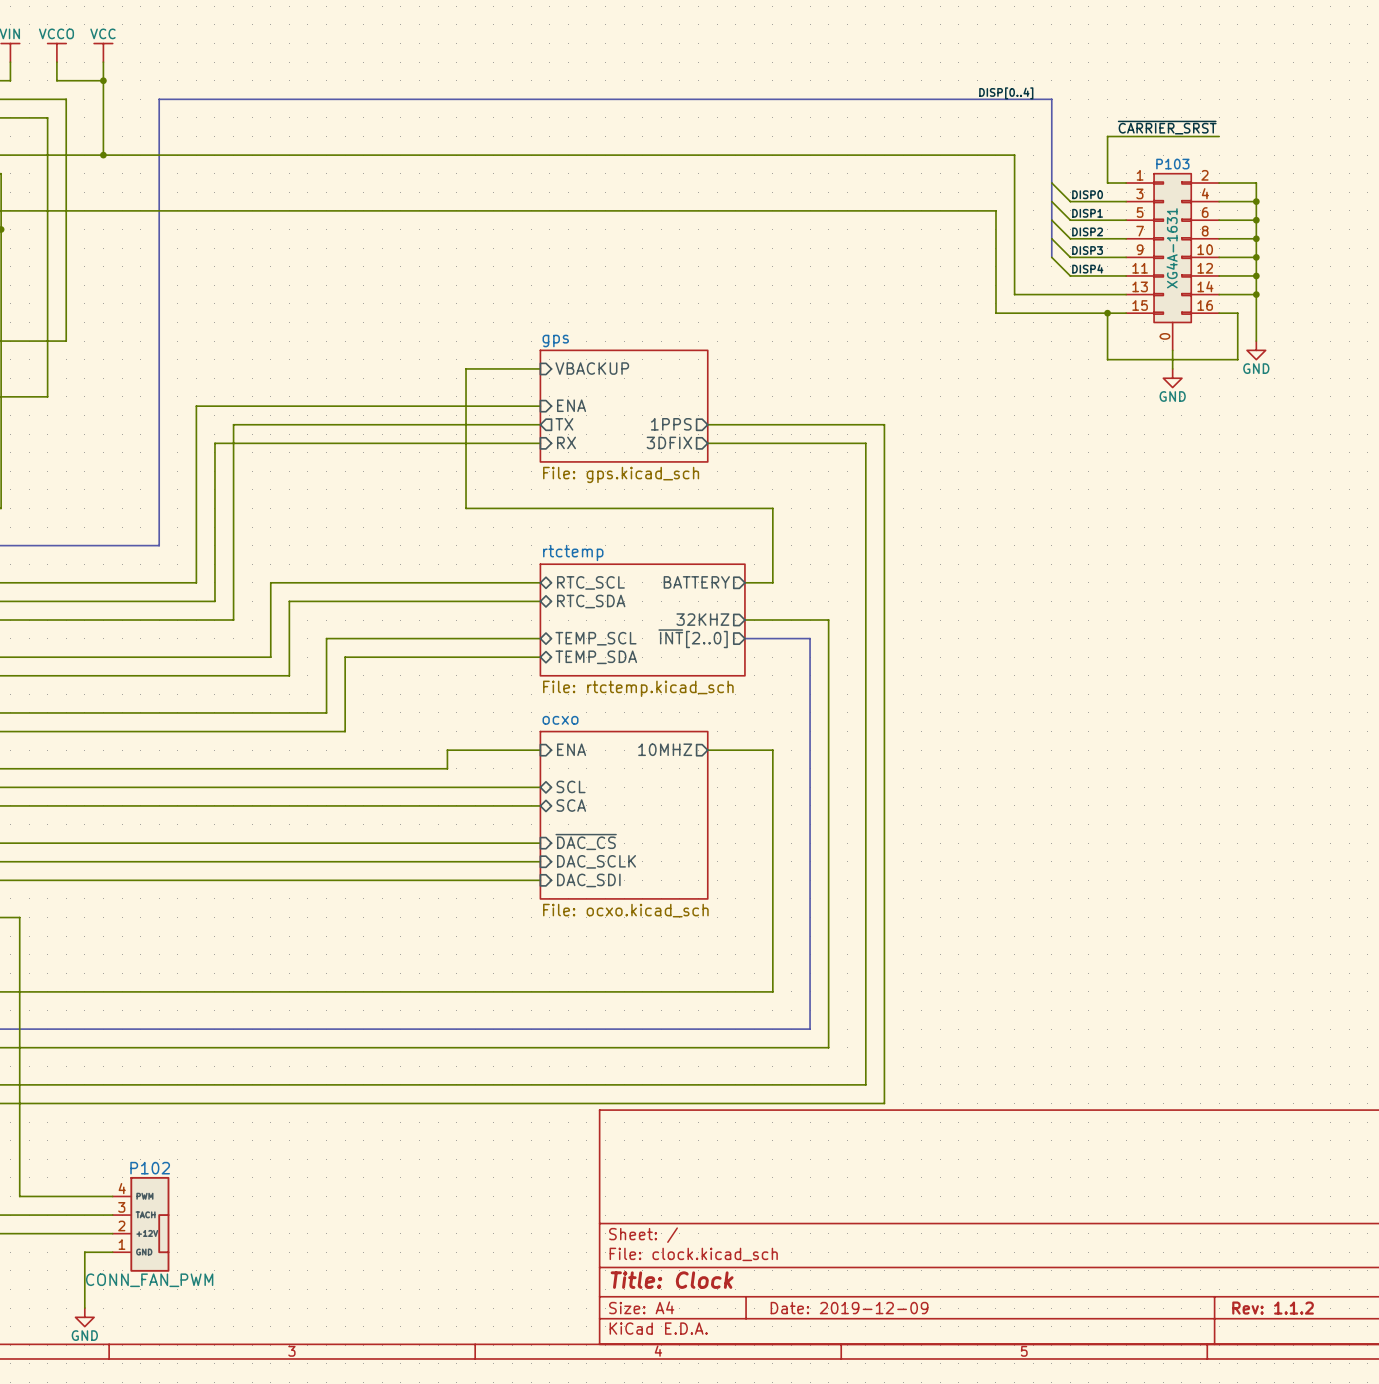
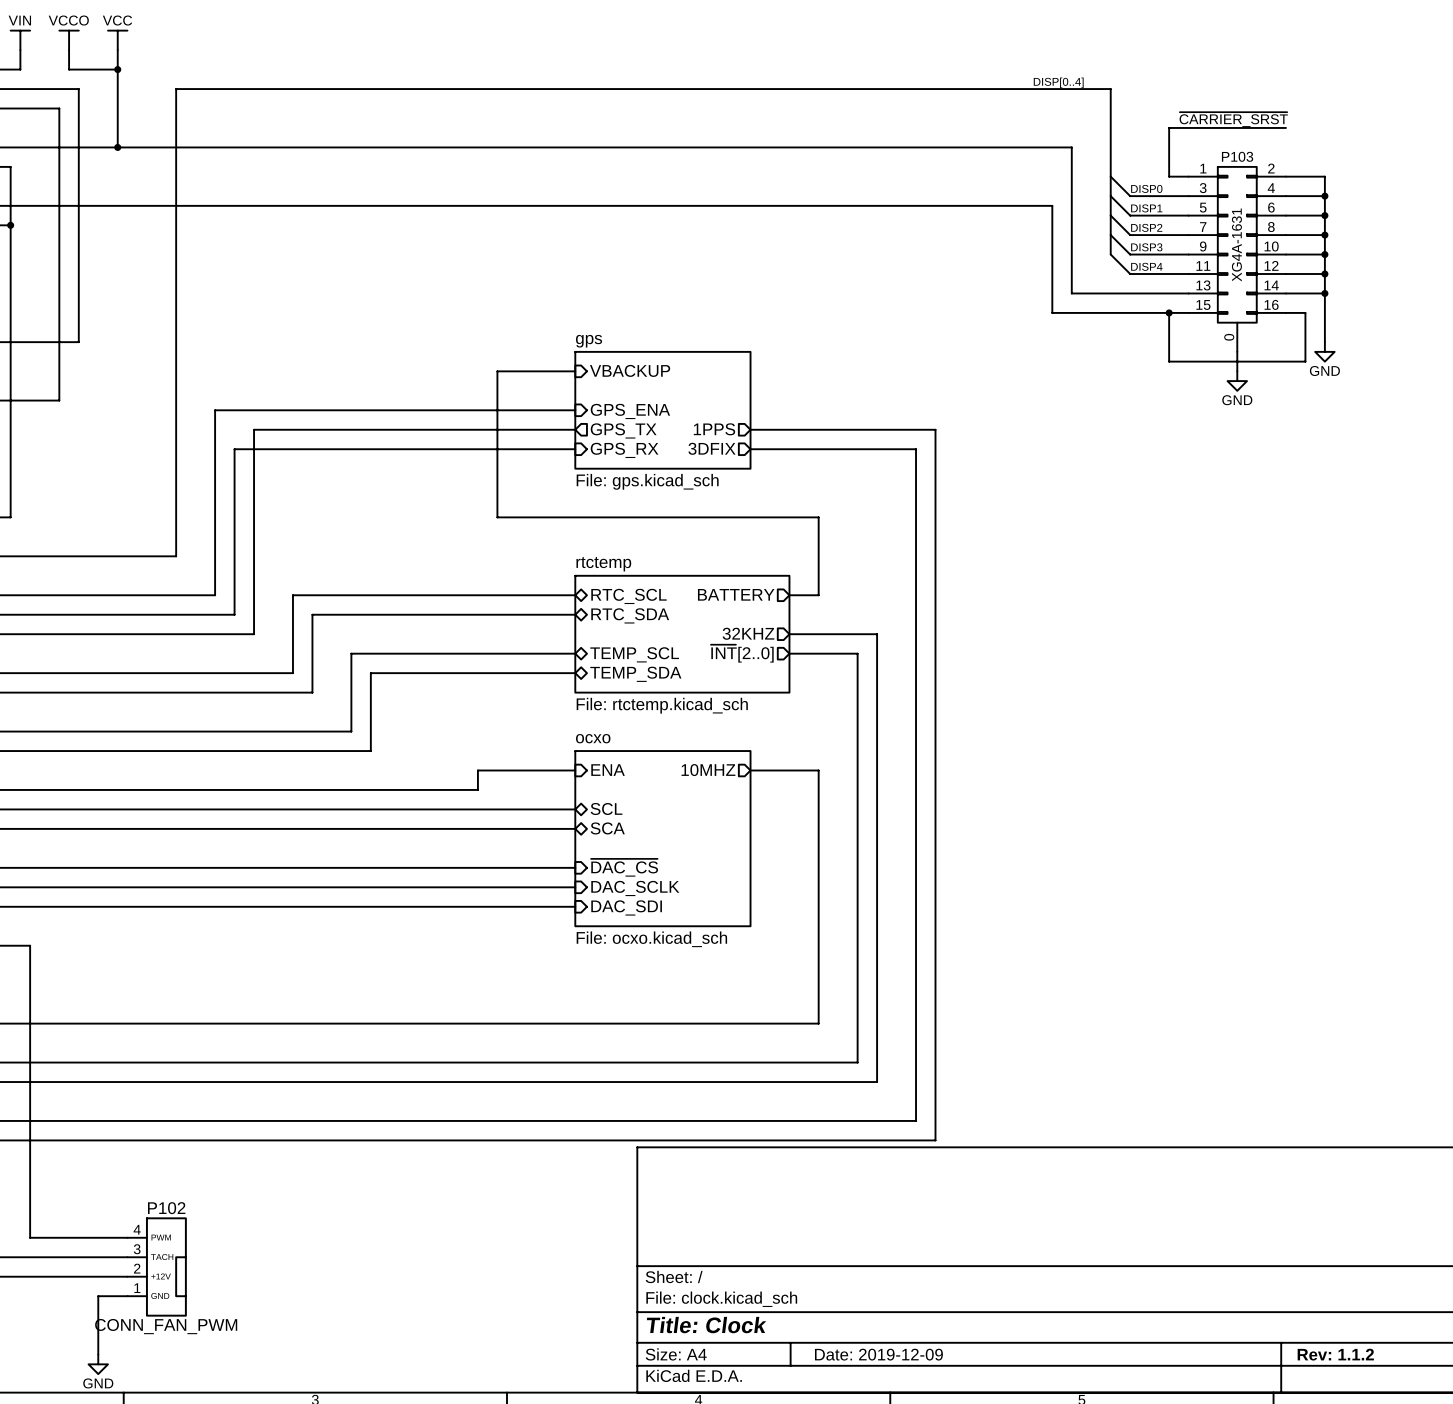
sheet pin: ENA (571, 405) -> GPS_ENA (630, 411)
sheet pin: TX (564, 424) -> GPS_TX (623, 430)
sheet pin: RX (566, 442) -> GPS_RX (624, 450)

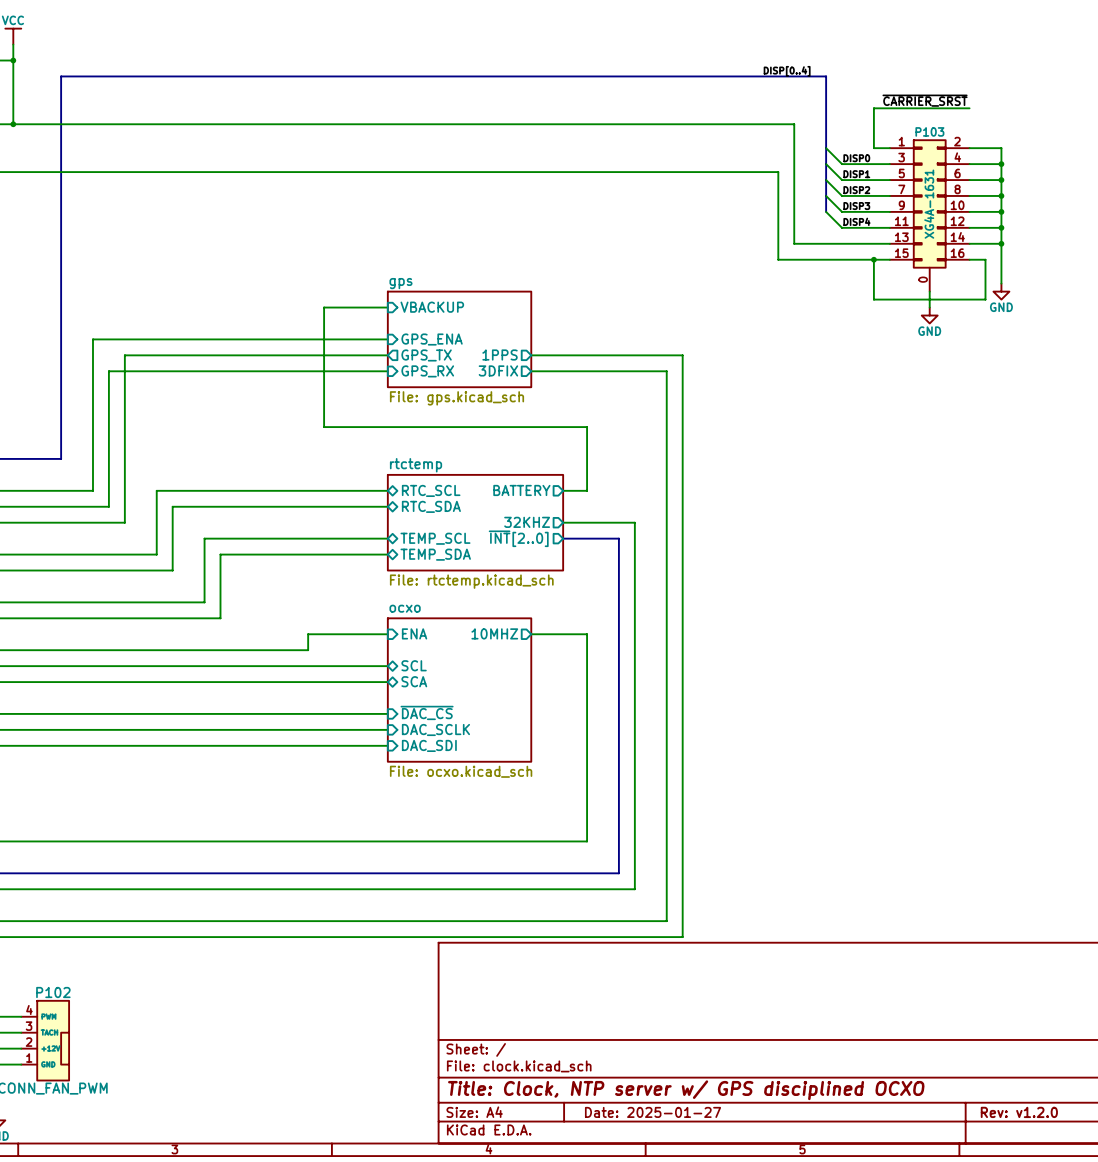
title block: Title: Clock (706, 1325) -> Title: Clock, NTP server w/ GPS disciplined OCXO (686, 1090)
title block: Date: 2019-12-09 (878, 1354) -> Date: 2025-01-27 (653, 1112)
title block: Rev: 1.1.2 (1335, 1354) -> Rev: v1.2.0 (1019, 1112)

